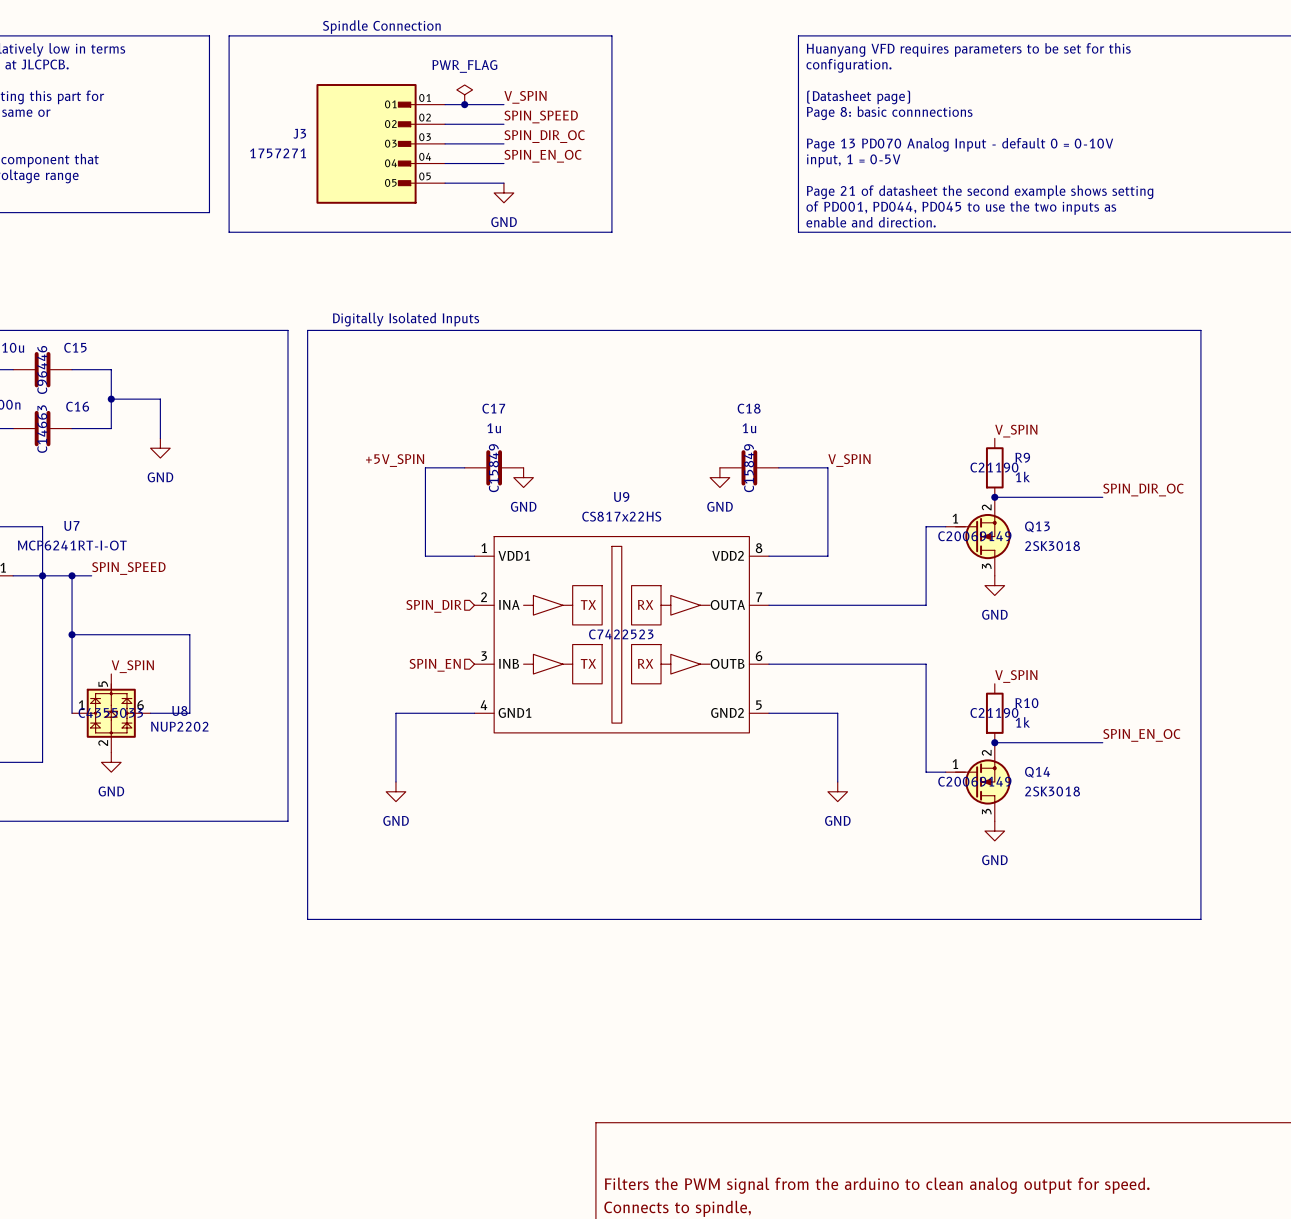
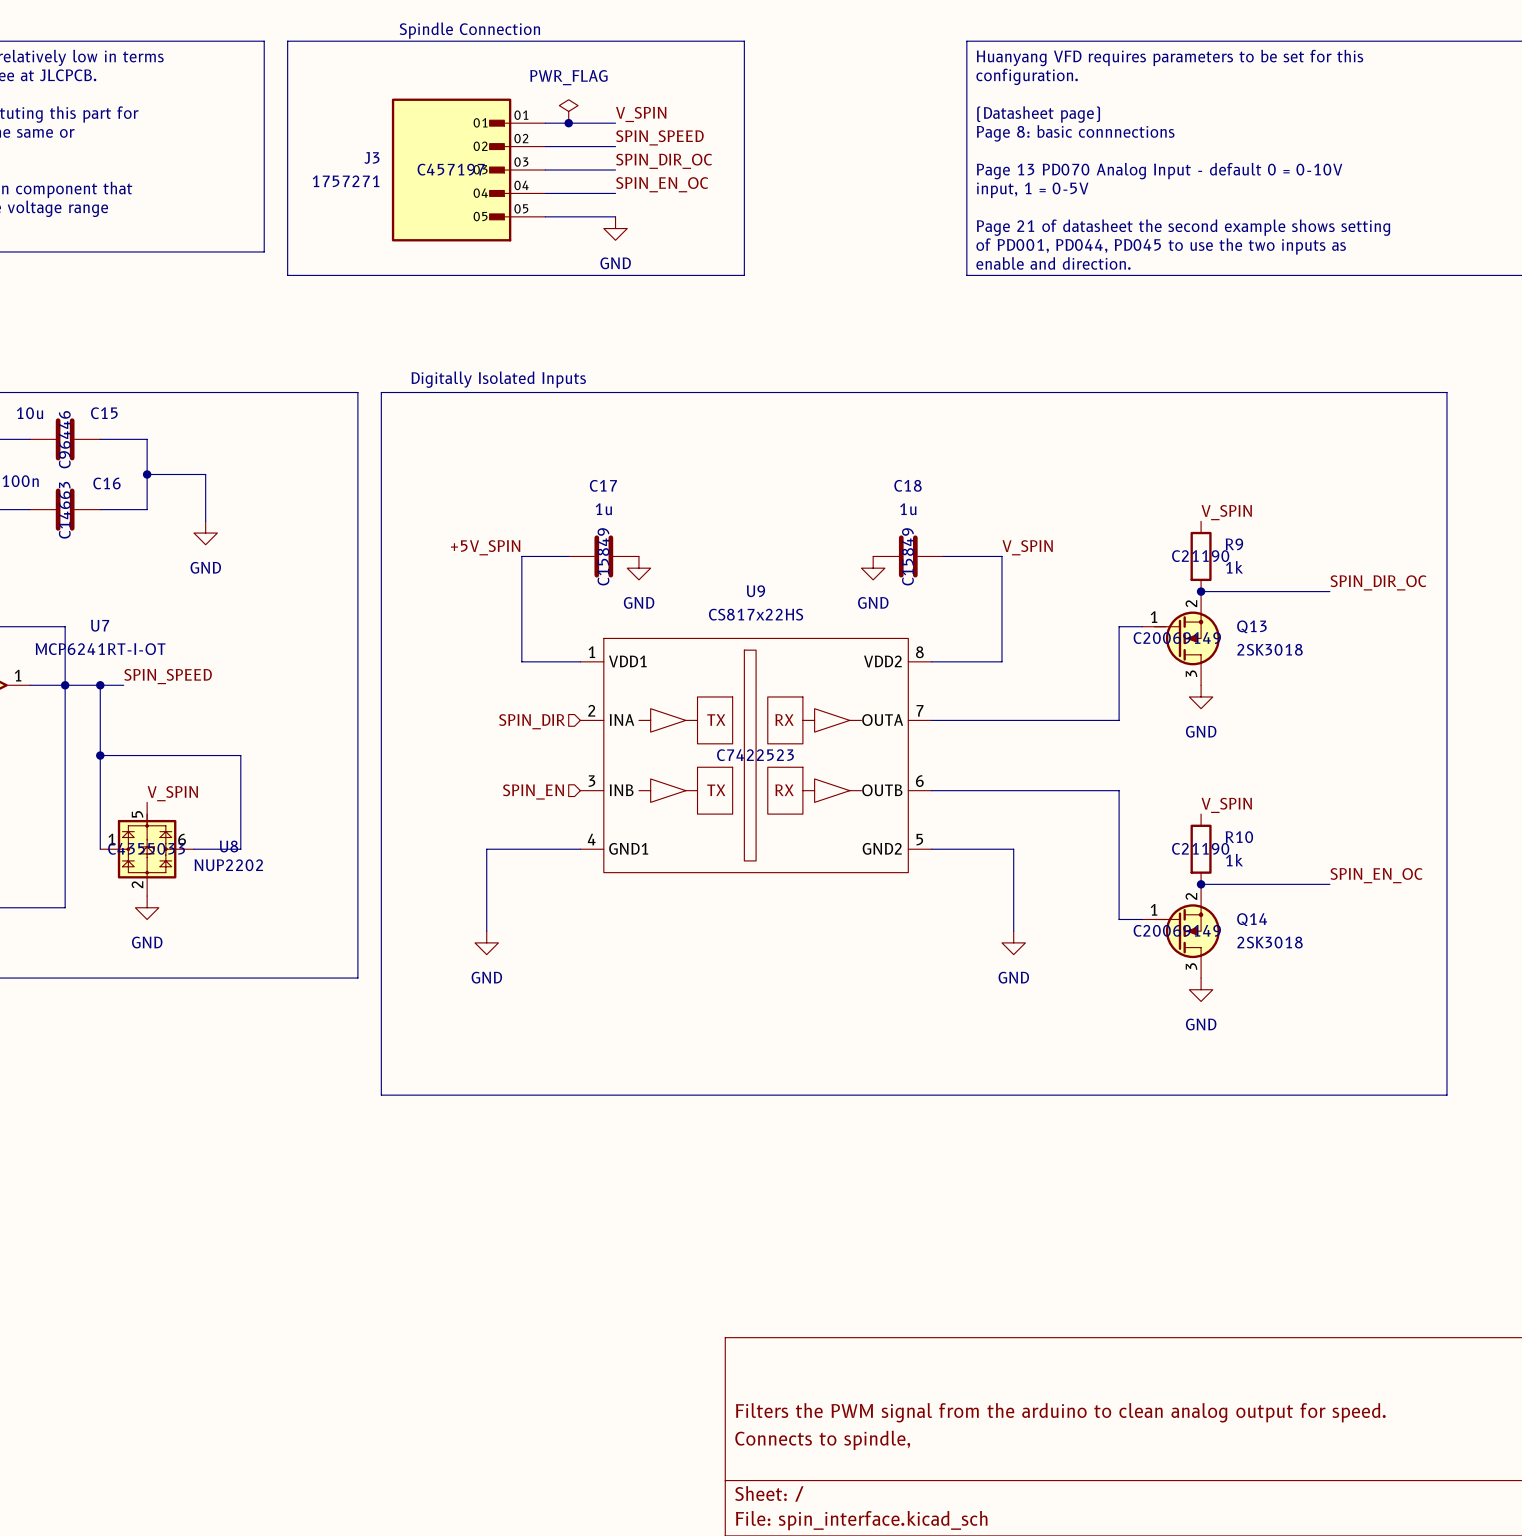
J3 text: none -> C457197 (451, 169)

